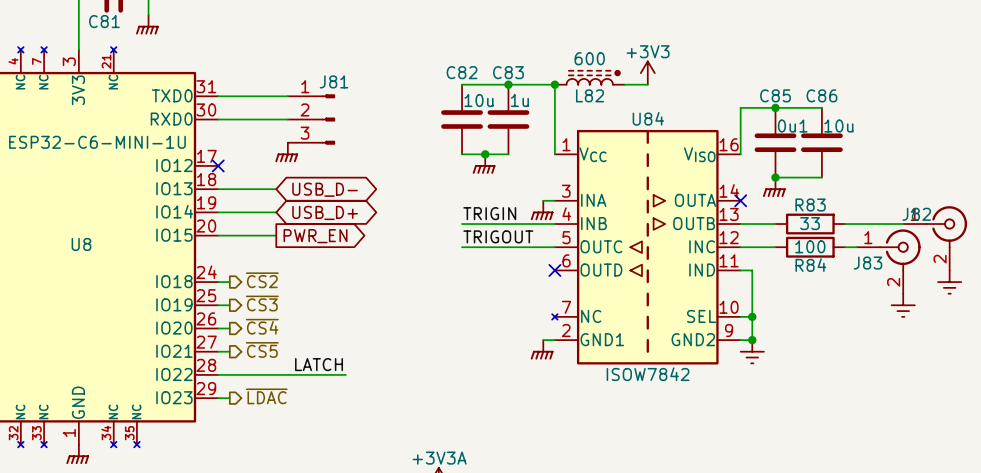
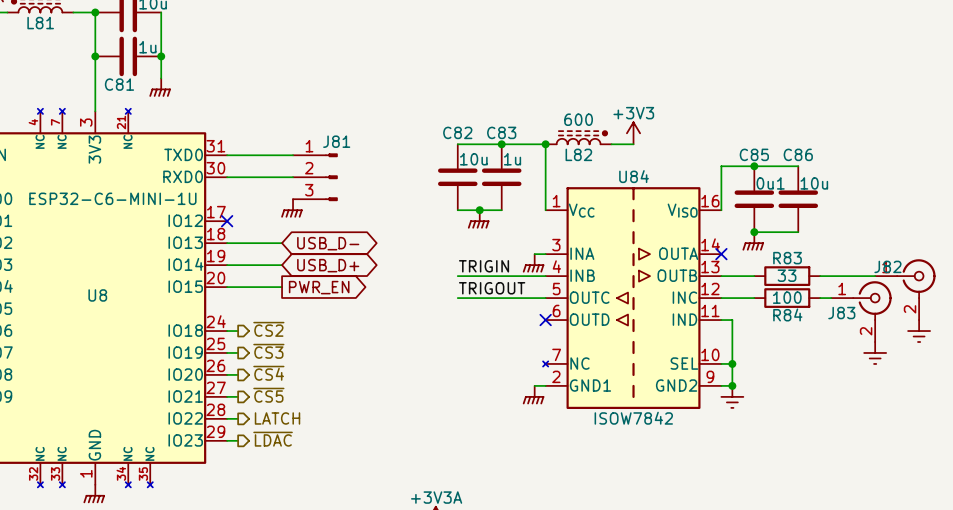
label: LATCH (319, 364) -> none
wire: (229, 374) (345, 374) -> none
hierarchical label: none -> LATCH (277, 418)

